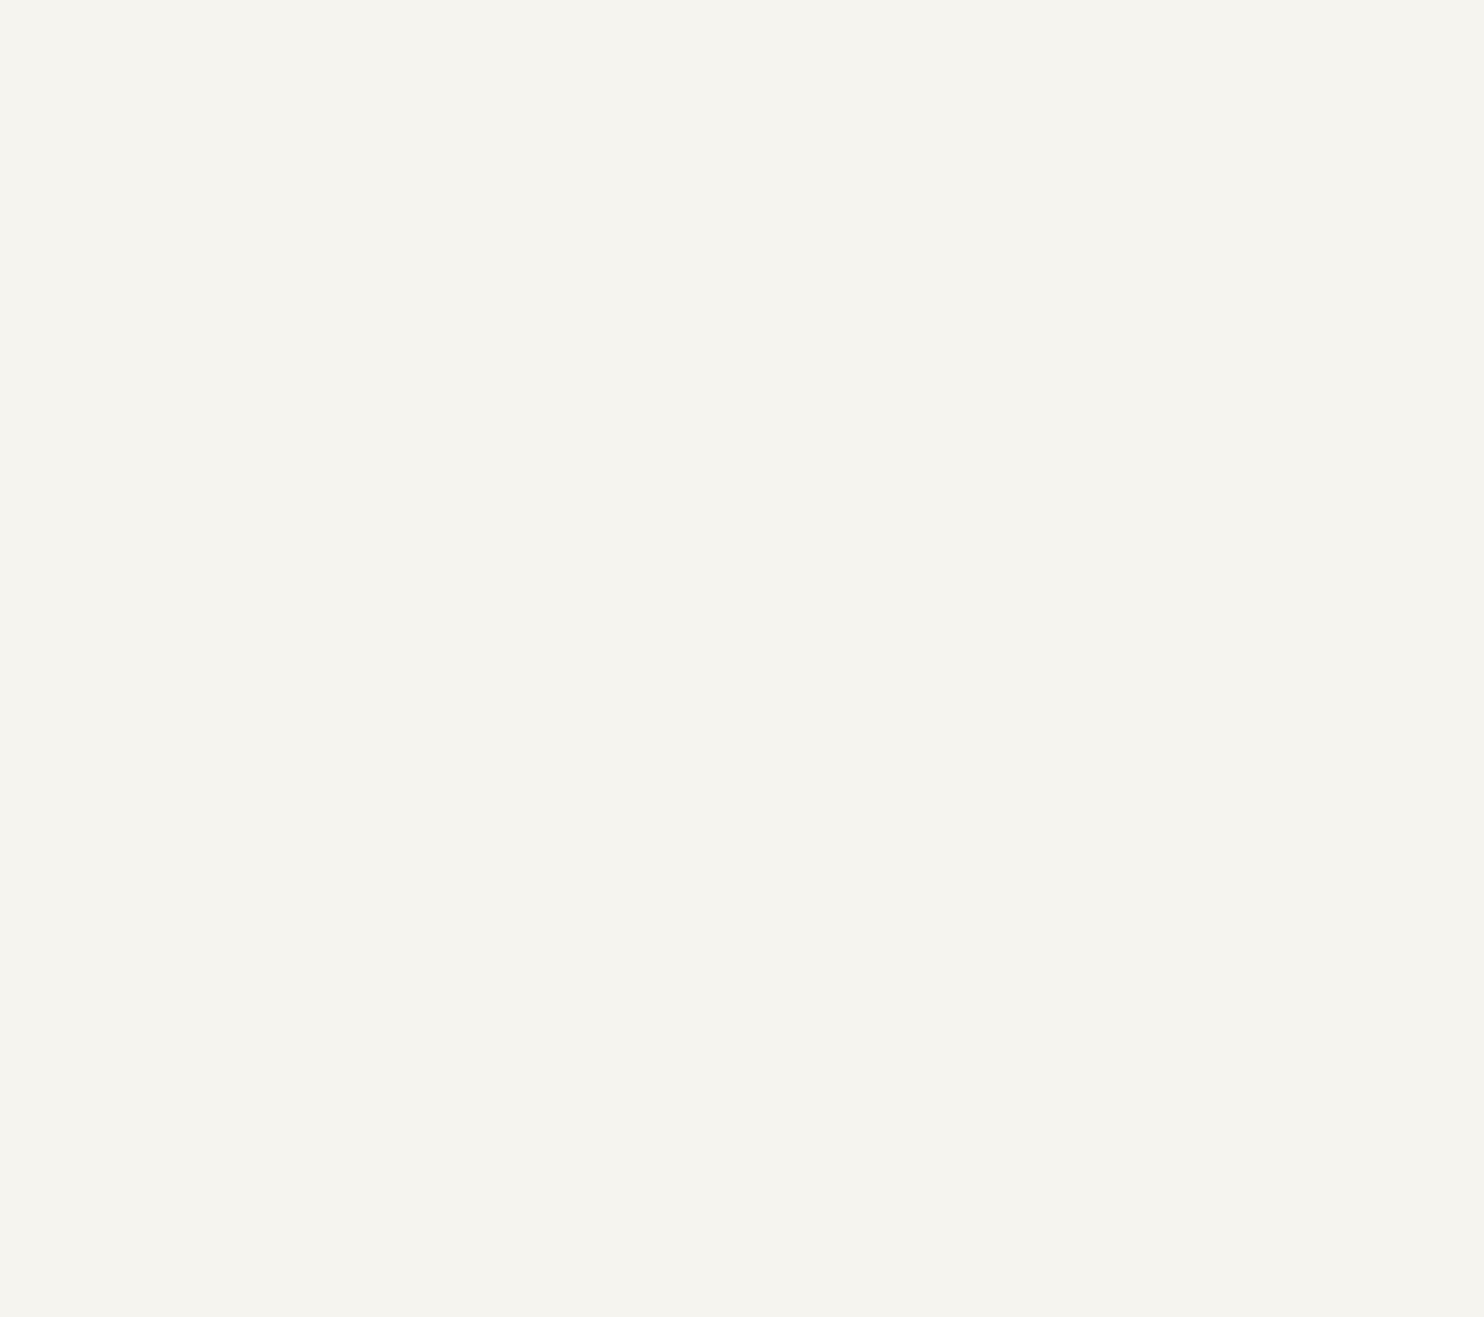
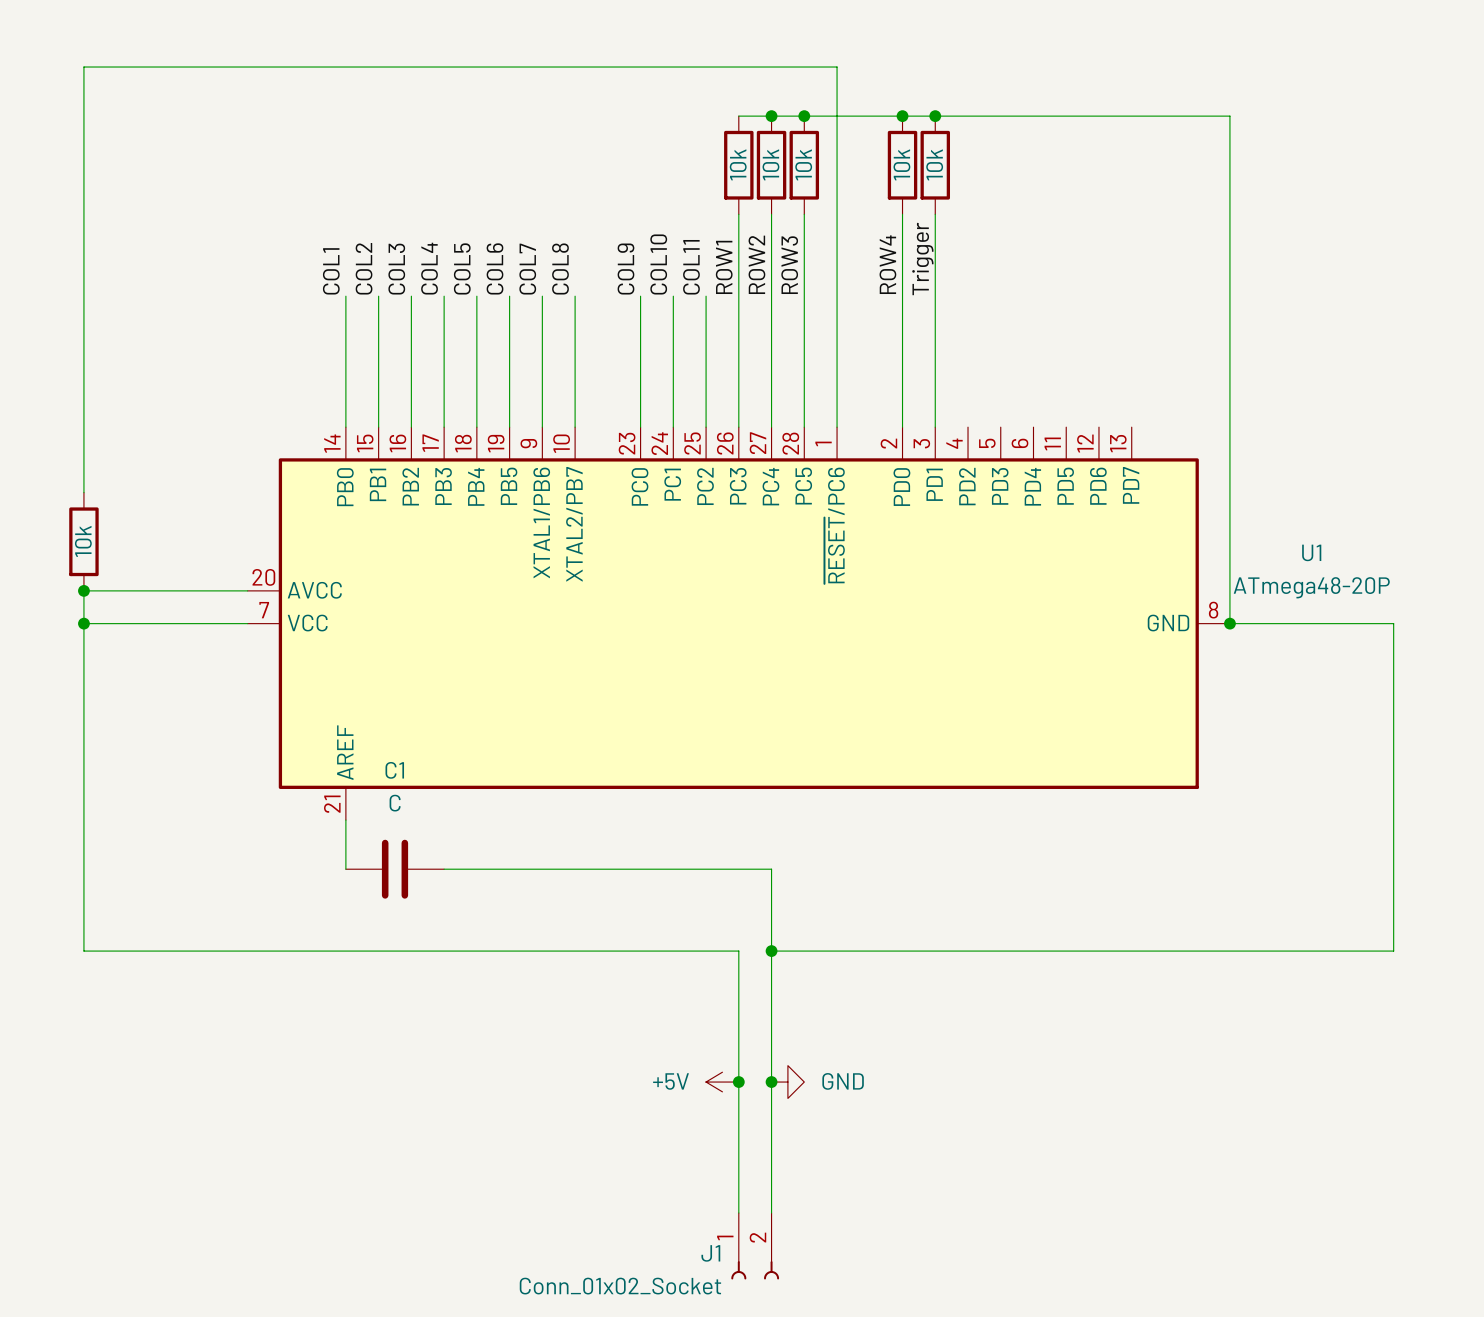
wire: none -> (738, 116) (1229, 116) (1229, 623) (1393, 623) (1393, 951) (771, 951)
junction: none -> (771, 116)
junction: none -> (804, 116)
junction: none -> (902, 116)
junction: none -> (935, 116)
part: none -> 10k (738, 165)
part: none -> 10k (771, 165)
part: none -> 10k (804, 165)
part: none -> 10k (902, 165)
part: none -> 10k (935, 165)
wire: none -> (738, 214) (738, 427)
wire: none -> (771, 214) (771, 427)
wire: none -> (804, 214) (804, 427)
wire: none -> (902, 214) (902, 427)
wire: none -> (935, 214) (935, 427)
label: none -> Trigger (922, 258)
label: none -> COL10 (658, 264)
label: none -> ROW2 (756, 264)
label: none -> ROW4 (887, 264)
label: none -> ROW3 (789, 265)
label: none -> COL11 (691, 267)
label: none -> ROW1 (724, 267)
label: none -> COL2 (364, 268)
label: none -> COL4 (429, 268)
label: none -> COL5 (462, 268)
label: none -> COL6 (495, 268)
label: none -> COL8 (560, 268)
label: none -> COL3 (396, 269)
label: none -> COL7 (527, 269)
label: none -> COL9 (625, 269)
label: none -> COL1 (331, 271)
wire: none -> (345, 296) (345, 427)
wire: none -> (378, 296) (378, 427)
wire: none -> (411, 296) (411, 427)
wire: none -> (444, 296) (444, 427)
wire: none -> (476, 296) (476, 427)
wire: none -> (509, 296) (509, 427)
wire: none -> (542, 296) (542, 427)
wire: none -> (575, 296) (575, 427)
wire: none -> (640, 296) (640, 427)
wire: none -> (673, 296) (673, 427)
wire: none -> (706, 296) (706, 427)
wire: none -> (837, 427) (837, 67) (83, 67) (83, 492)
part: none -> 10k (83, 541)
junction: none -> (83, 590)
wire: none -> (247, 590) (83, 590) (83, 951) (738, 951) (738, 1213)
wire: none -> (83, 623) (247, 623)
junction: none -> (83, 623)
U1: none -> ATmega48-20P (738, 623)
junction: none -> (1229, 623)
wire: none -> (345, 820) (345, 869)
C1: none -> C (395, 869)
wire: none -> (444, 869) (771, 869) (771, 1213)
junction: none -> (771, 951)
power symbol: none -> +5V (722, 1082)
junction: none -> (738, 1082)
junction: none -> (771, 1082)
power symbol: none -> GND (787, 1082)
J1: none -> Conn_01x02_Socket (755, 1246)

